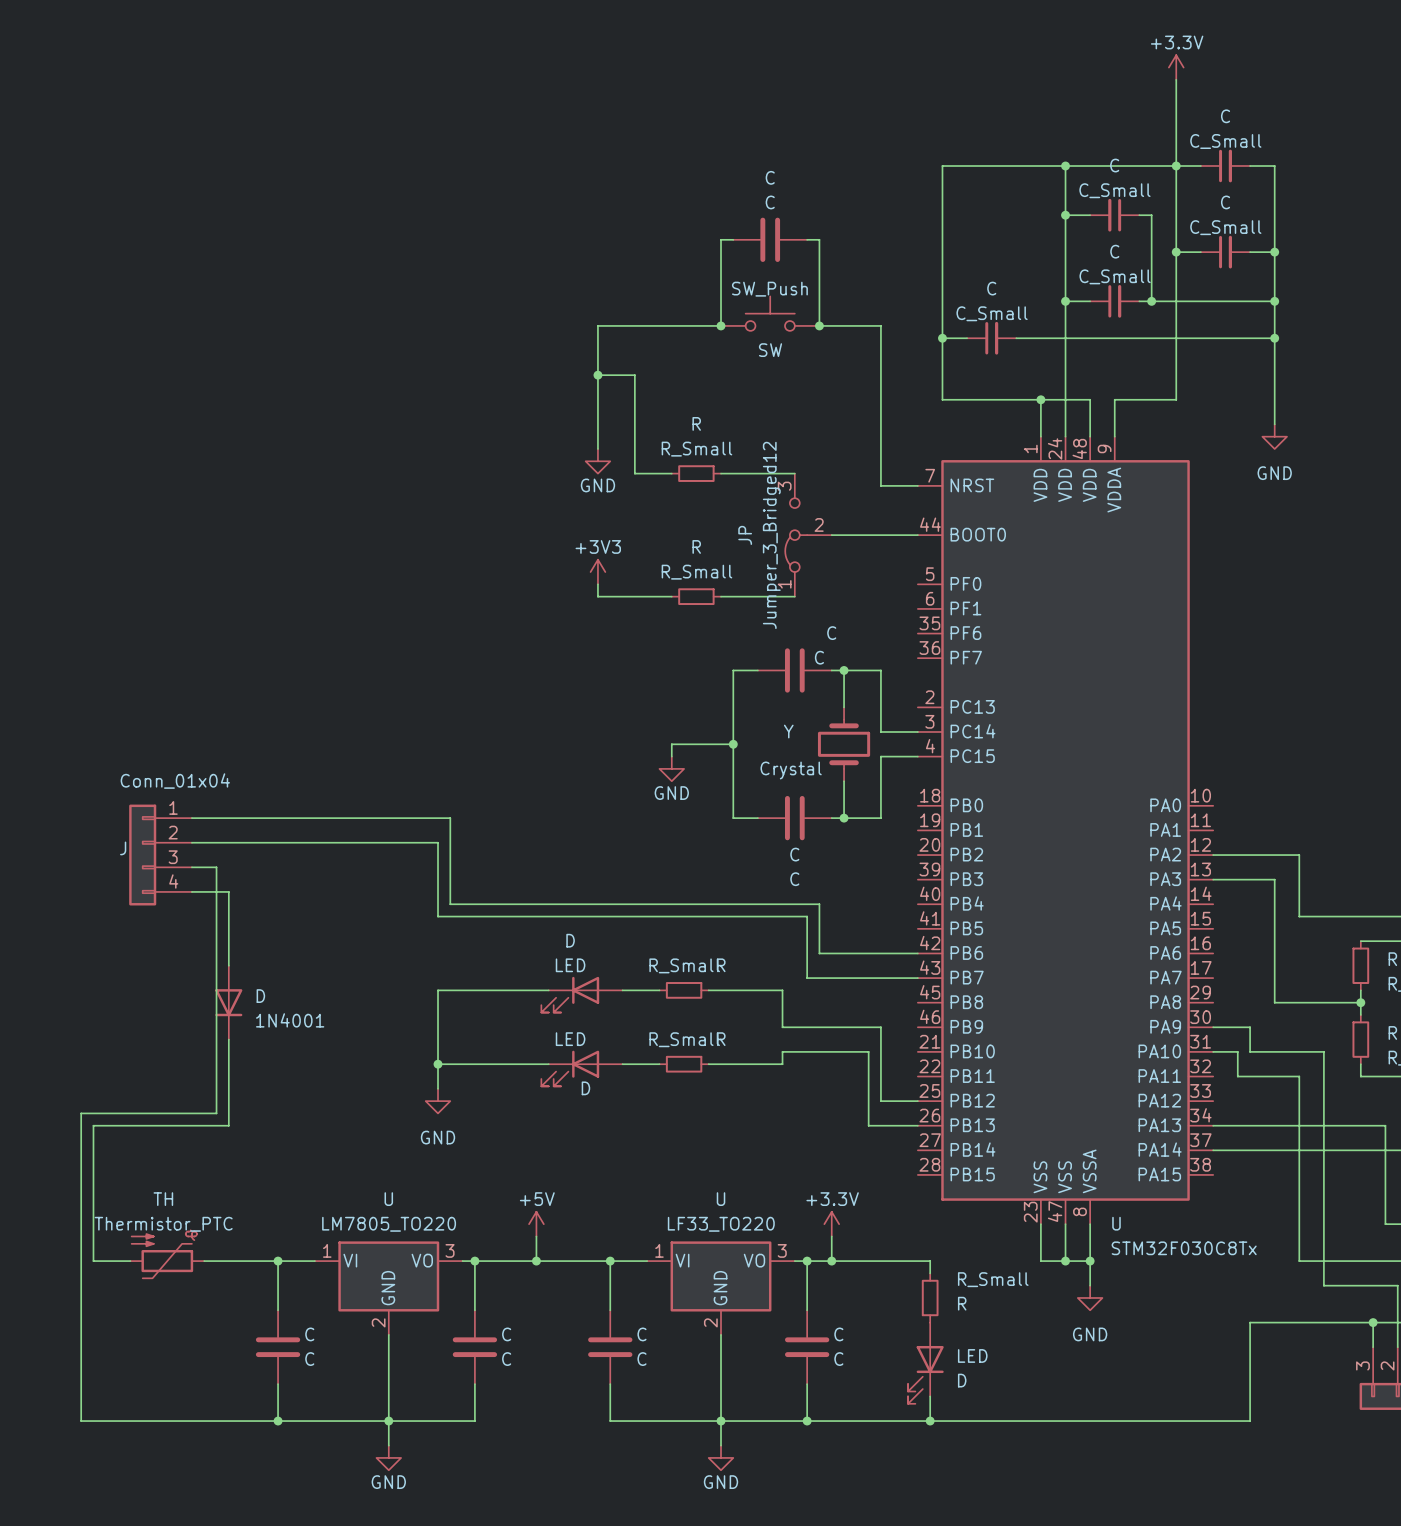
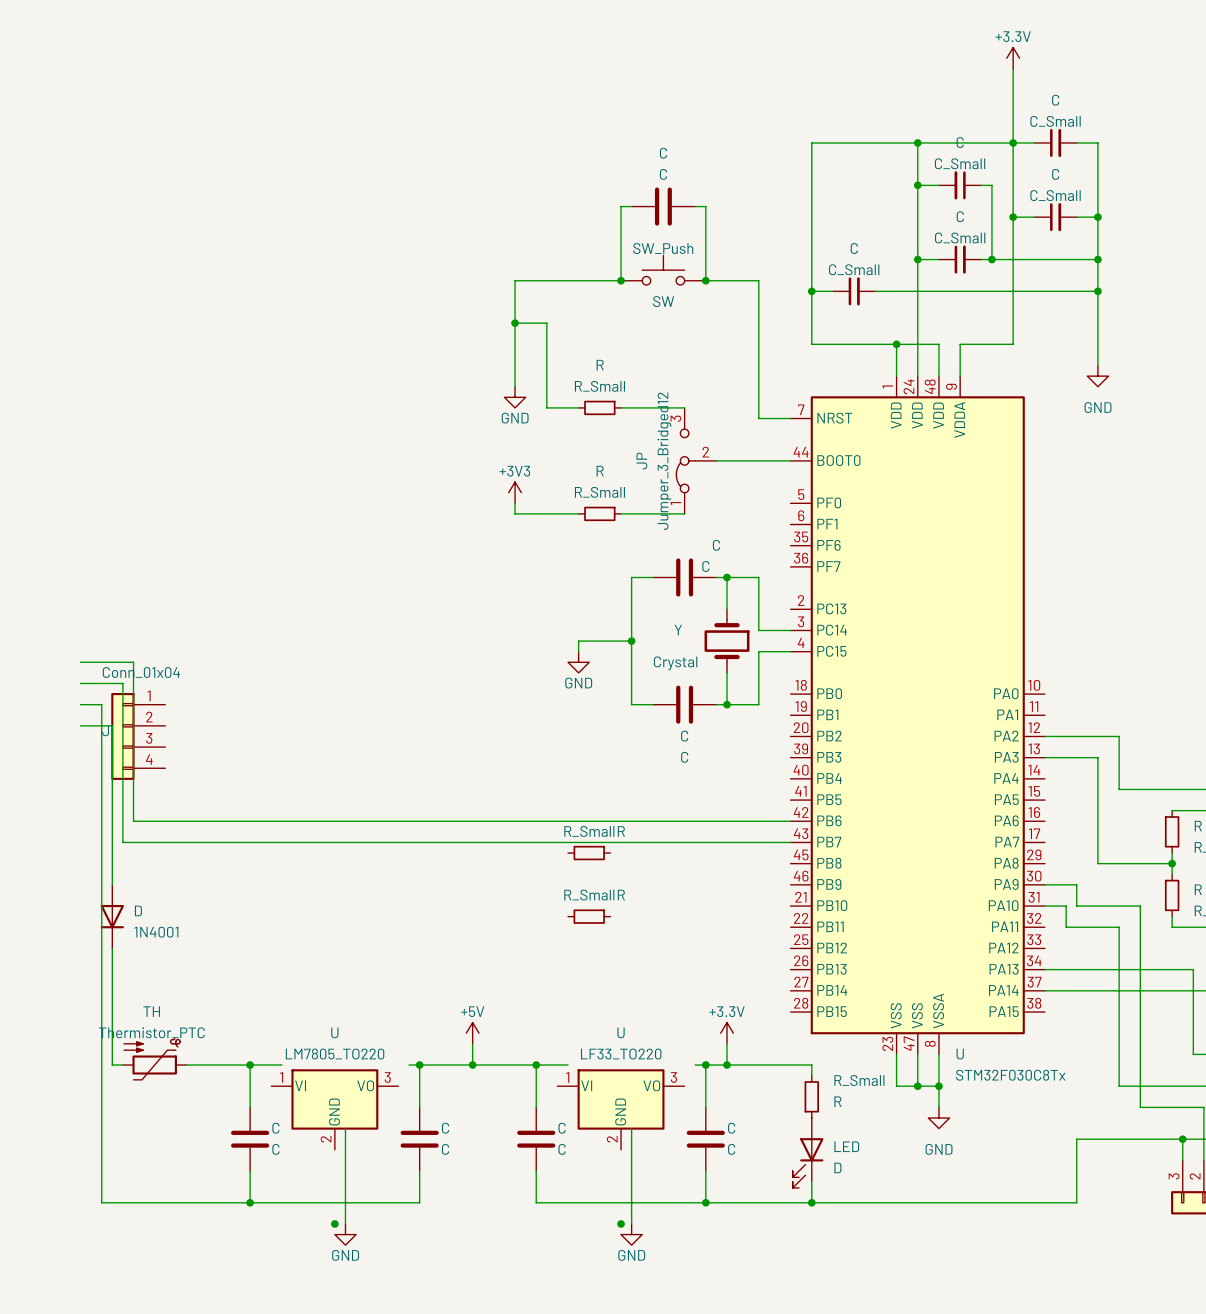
wire: none -> (80, 704) (101, 704) (101, 1202) (419, 1202) (419, 1170)
wire: (191, 818) (450, 818) (450, 904) (819, 904) (819, 953) -> (80, 662) (133, 662) (133, 821) (705, 821)
wire: none -> (80, 725) (112, 725) (112, 884)
wire: (191, 842) (438, 842) (438, 916) (807, 916) (807, 978) -> (80, 683) (122, 683) (122, 842) (695, 842)
wire: (191, 867) (216, 867) (216, 1113) (81, 1113) (81, 1421) (474, 1421) (474, 1384) -> none
wire: (191, 891) (228, 891) (228, 965) -> none
wire: (548, 990) (438, 990) (438, 1088) -> none
wire: (622, 990) (659, 990) -> none
wire: (708, 990) (782, 990) (782, 1027) (880, 1027) (880, 1101) (917, 1101) -> none
D: LED (581, 994) -> none
D position: (228, 1002) -> (112, 916)
wire: (228, 1039) (228, 1125) (93, 1125) (93, 1261) (130, 1261) -> none
wire: (438, 1064) (548, 1064) -> none
junction: (438, 1064) -> none
wire: (622, 1064) (659, 1064) -> none
wire: (708, 1064) (782, 1064) (782, 1051) (868, 1051) (868, 1125) (917, 1125) -> none
D: LED (581, 1068) -> none
wire: none -> (112, 948) (112, 1065) (122, 1065)
power symbol: GND (438, 1101) -> none
power symbol position: +5V (536, 1224) -> +5V (472, 1033)
power symbol position: +3.3V (831, 1224) -> +3.3V (727, 1033)
junction: none -> (419, 1065)
wire: (536, 1236) (536, 1261) -> (472, 1043) (472, 1065)
junction: none -> (472, 1065)
junction: none -> (705, 1065)
wire: (831, 1236) (831, 1261) -> (727, 1043) (727, 1065)
junction: none -> (727, 1065)
TH position: (167, 1254) -> (154, 1059)
wire: (204, 1261) (314, 1261) -> (186, 1065) (281, 1065)
wire: (278, 1261) (278, 1310) -> (250, 1065) (250, 1107)
junction position: (278, 1261) -> (250, 1065)
wire: (462, 1261) (647, 1261) -> (409, 1065) (568, 1065)
wire: (474, 1261) (474, 1310) -> (419, 1065) (419, 1107)
junction: (474, 1261) -> none
junction: (536, 1261) -> none
wire: (610, 1261) (610, 1310) -> (536, 1065) (536, 1107)
junction position: (610, 1261) -> (536, 1065)
wire: (794, 1261) (930, 1261) (930, 1273) -> (695, 1065) (811, 1065) (811, 1075)
wire: (807, 1261) (807, 1310) -> (705, 1065) (705, 1107)
junction: (807, 1261) -> none
junction: (831, 1261) -> none
R position: (930, 1297) -> (811, 1096)
wire: (388, 1334) (388, 1445) -> (345, 1128) (345, 1223)
wire: (721, 1334) (721, 1445) -> (631, 1128) (631, 1223)
C position: (278, 1347) -> (250, 1139)
C position: (474, 1347) -> (419, 1139)
C position: (610, 1347) -> (536, 1139)
C position: (807, 1347) -> (705, 1139)
D position: (925, 1363) -> (808, 1152)
wire: (278, 1384) (278, 1421) -> (250, 1170) (250, 1202)
wire: (610, 1384) (610, 1421) (1250, 1421) (1250, 1396) -> (536, 1170) (536, 1202) (1076, 1202)
wire: (807, 1384) (807, 1421) -> (705, 1170) (705, 1202)
wire: (930, 1396) (930, 1421) -> (811, 1181) (811, 1202)
junction position: (278, 1421) -> (250, 1202)
junction position: (807, 1421) -> (705, 1202)
junction position: (930, 1421) -> (811, 1202)
power symbol position: GND (388, 1457) -> GND (345, 1234)
power symbol position: GND (721, 1457) -> GND (631, 1234)

